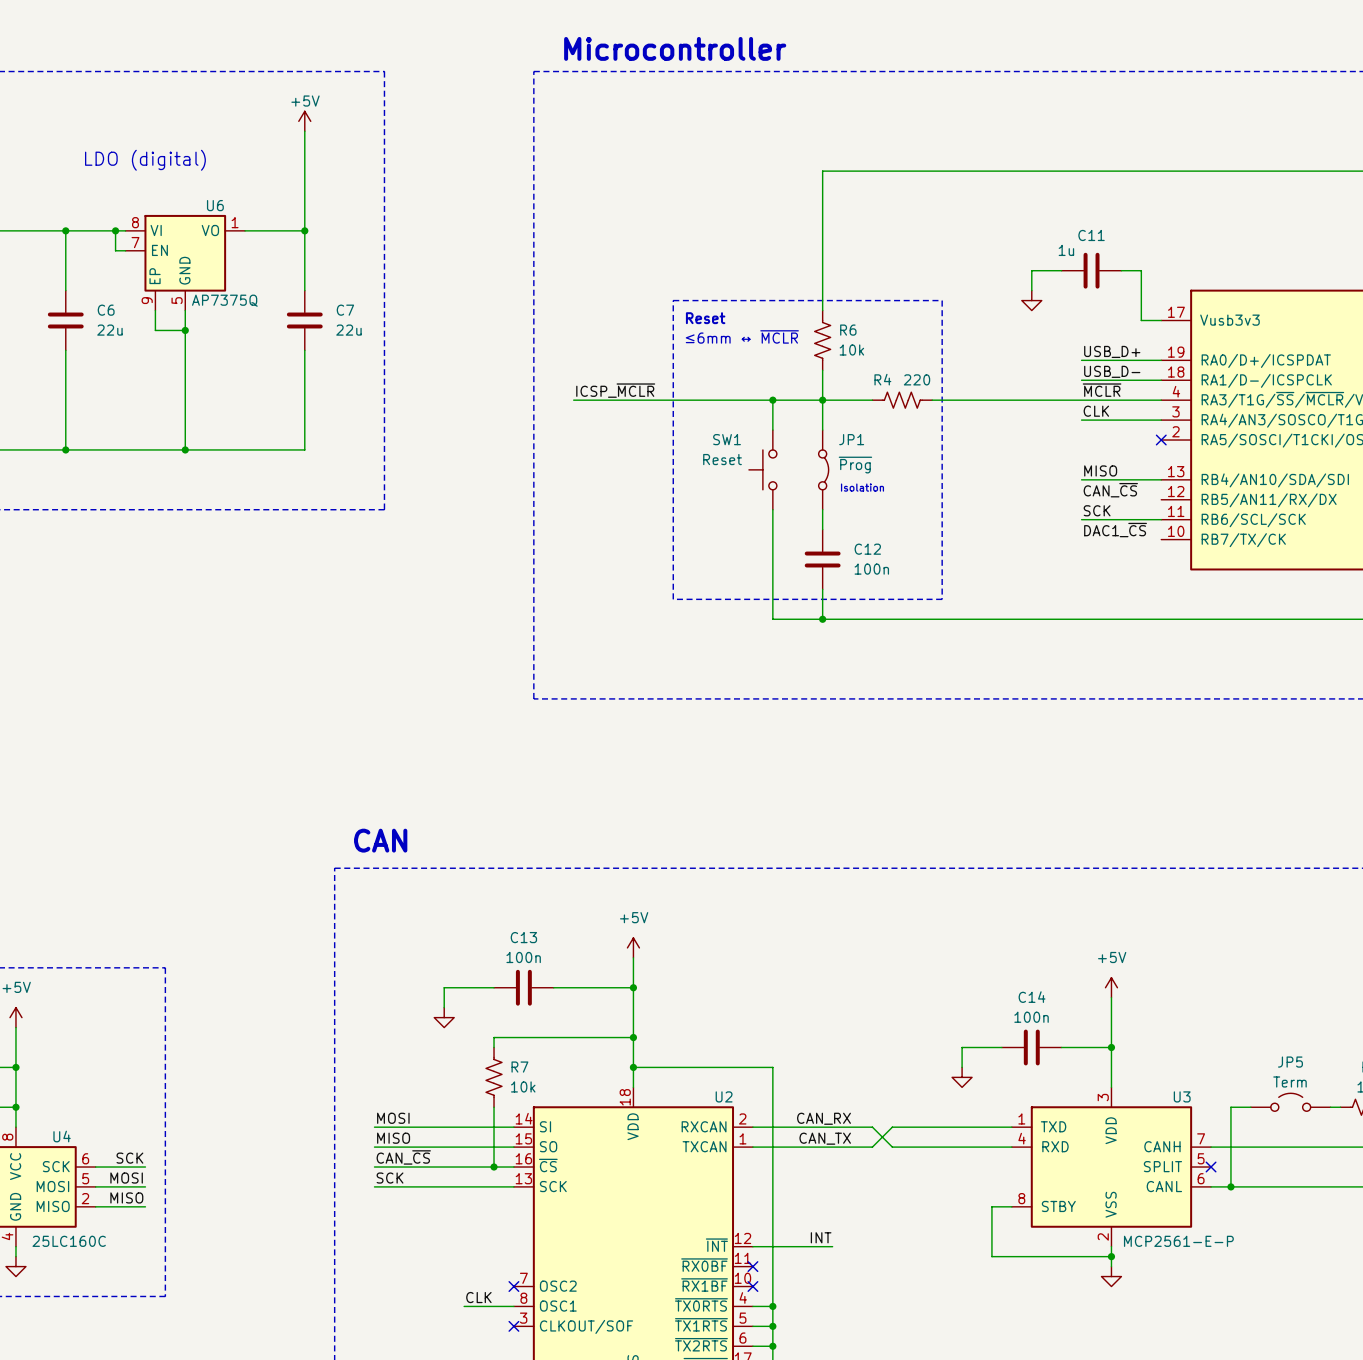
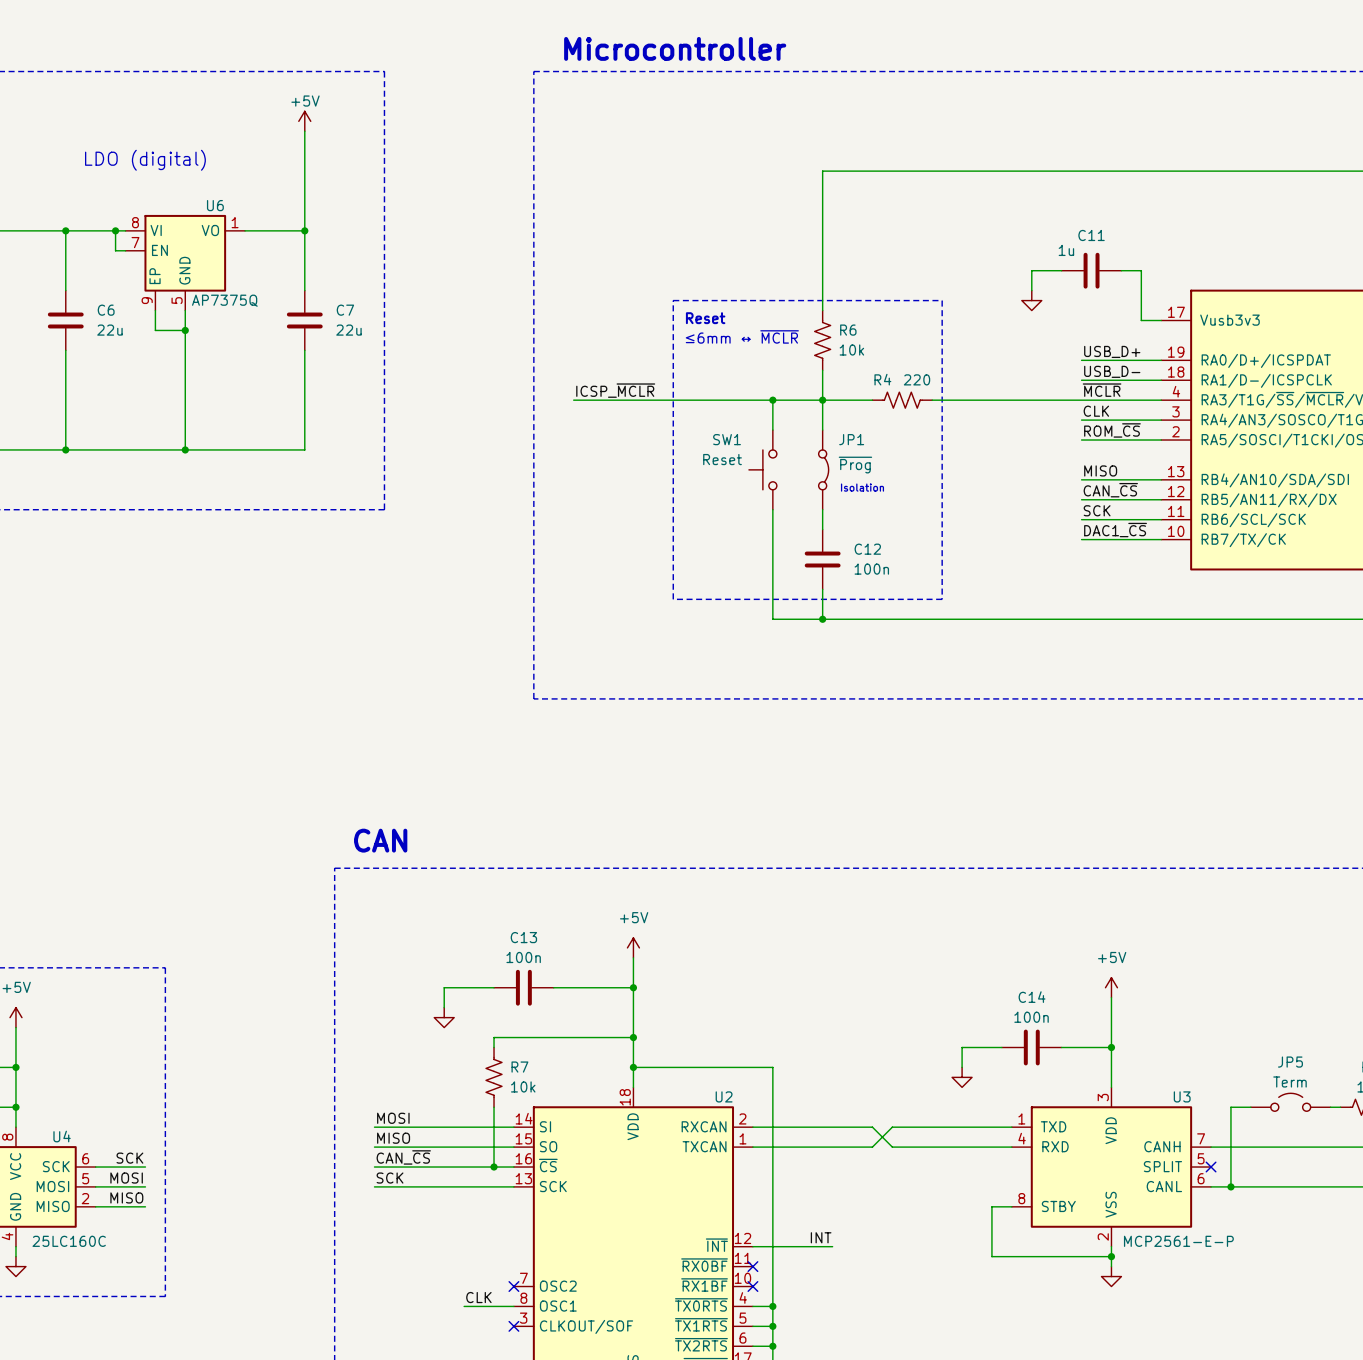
label: none -> ROM_~{CS} (1112, 430)
wire: none -> (1081, 440) (1161, 440)
no-connect mark: (1161, 440) -> none
wire: none -> (1081, 499) (1161, 499)
wire: none -> (1081, 539) (1161, 539)
label: CAN_RX (824, 1118) -> none
label: CAN_TX (825, 1138) -> none

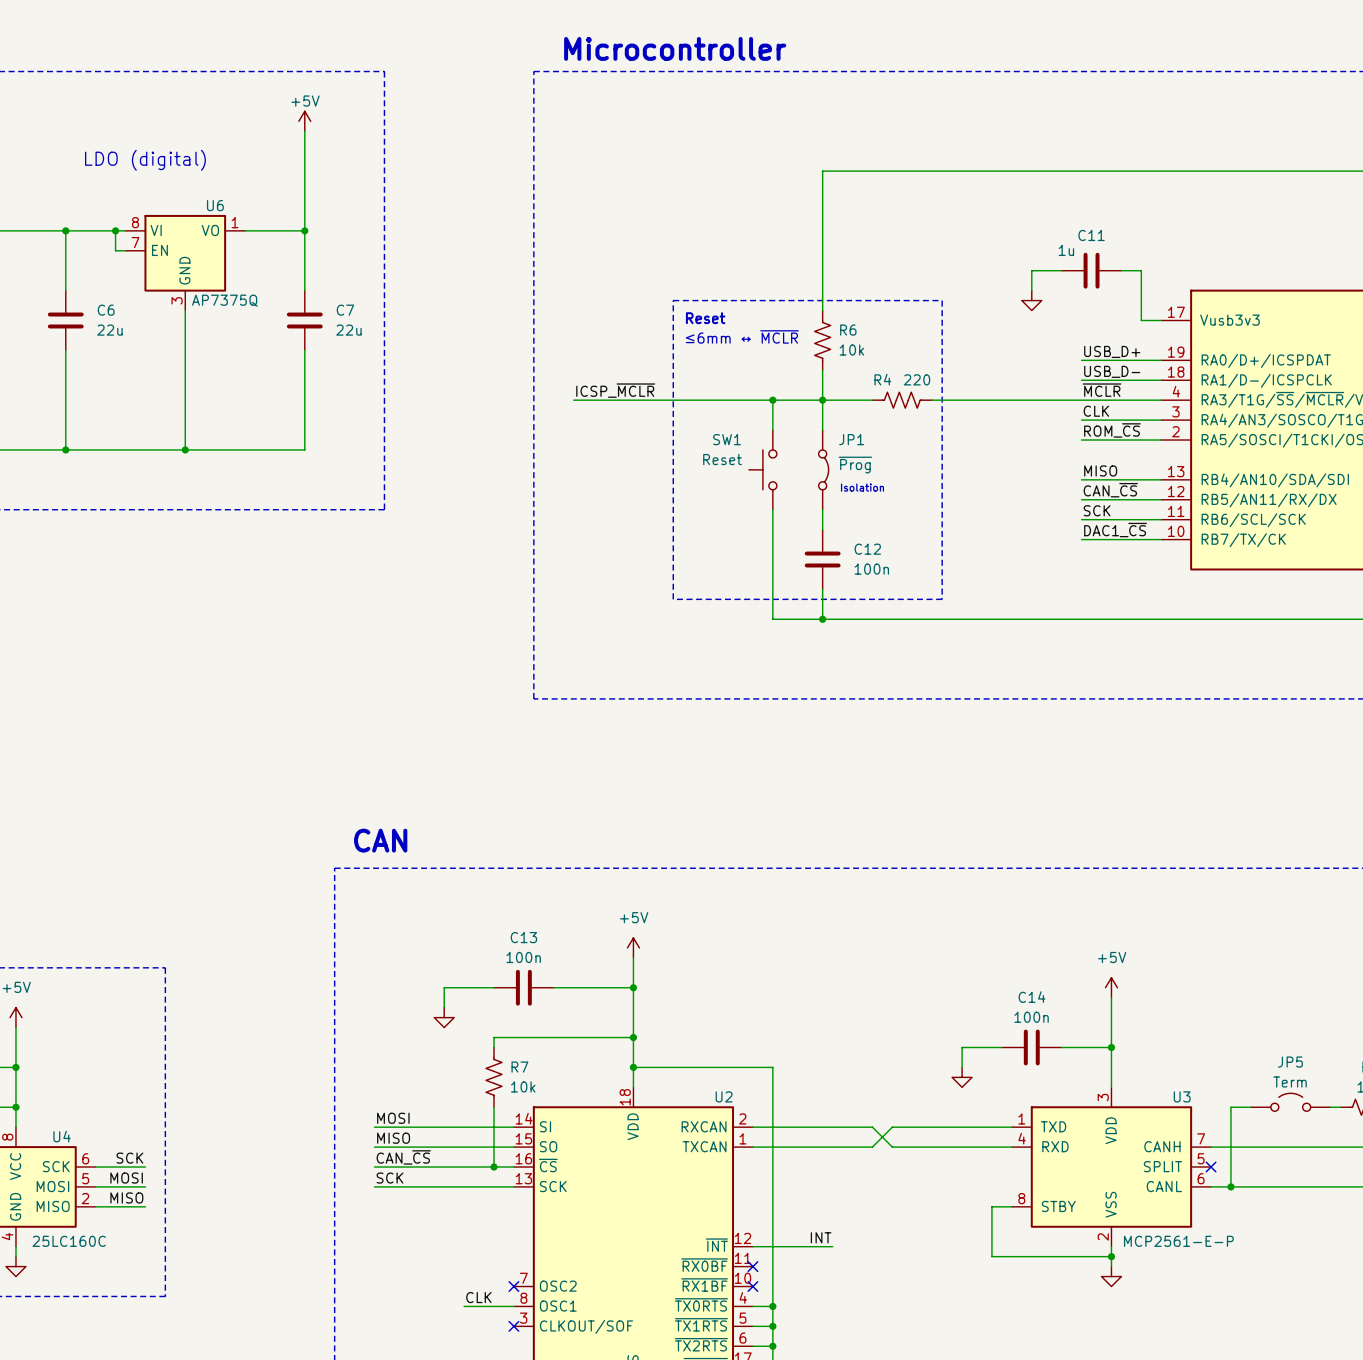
U6 symbol: [125, 214, 246, 311] -> [125, 214, 246, 311]
wire: (155, 310) (155, 330) (185, 330) -> none
junction: (185, 330) -> none

